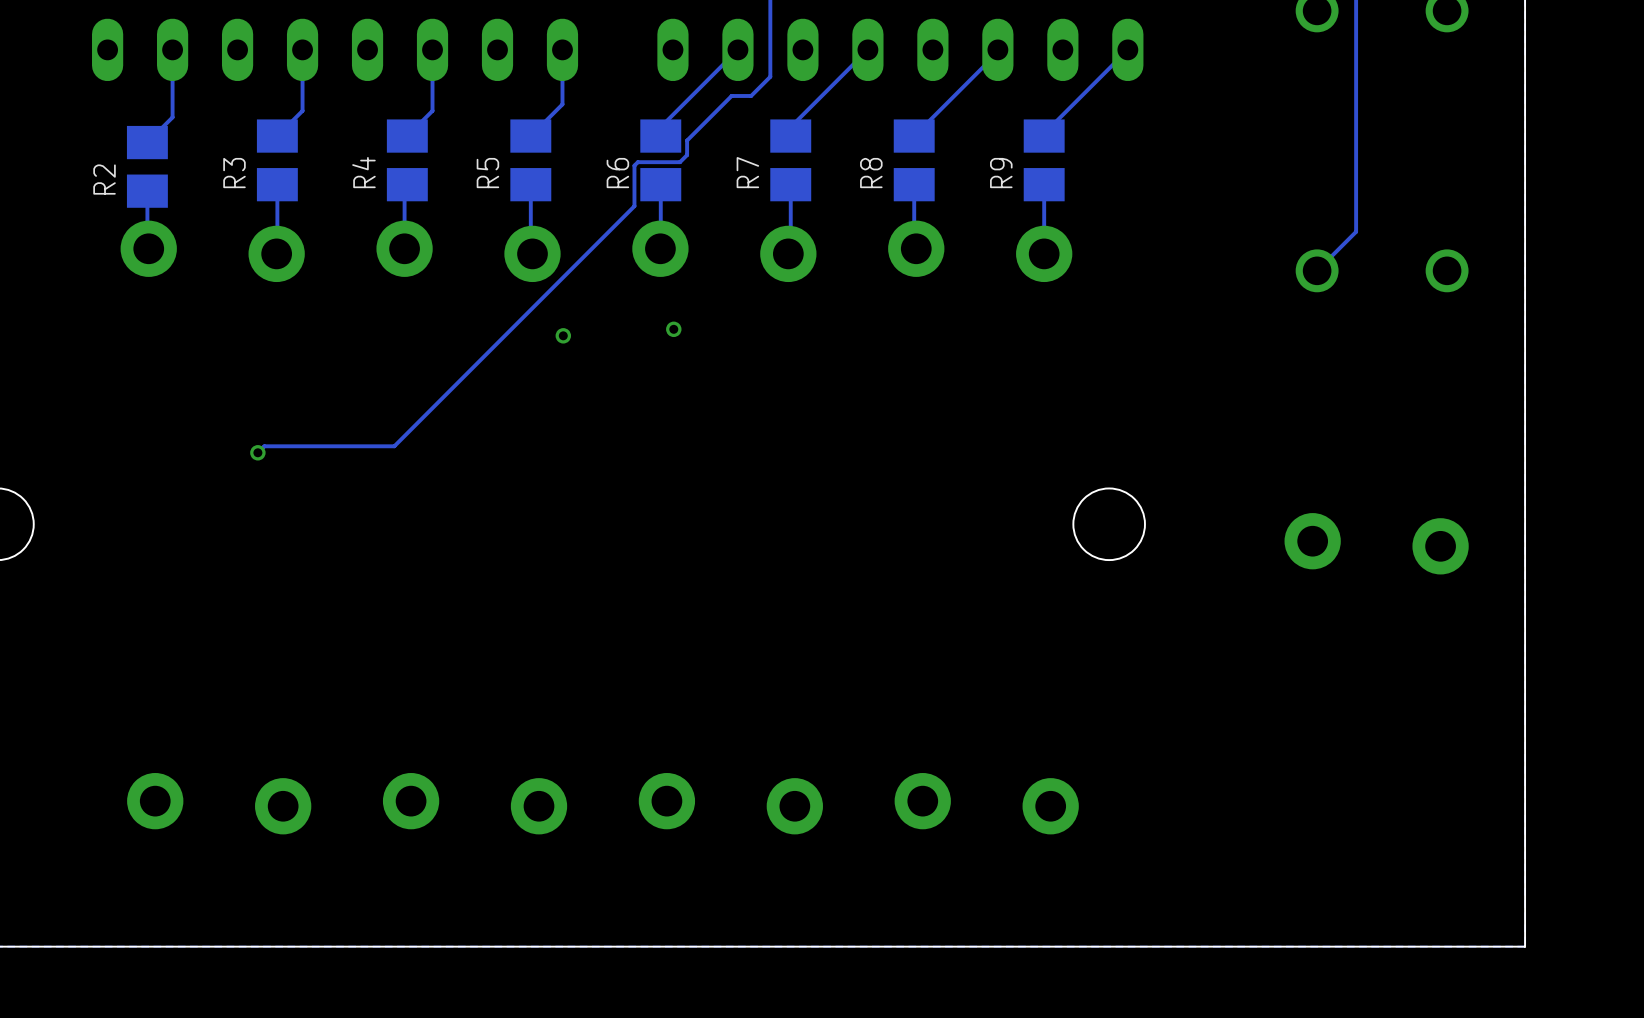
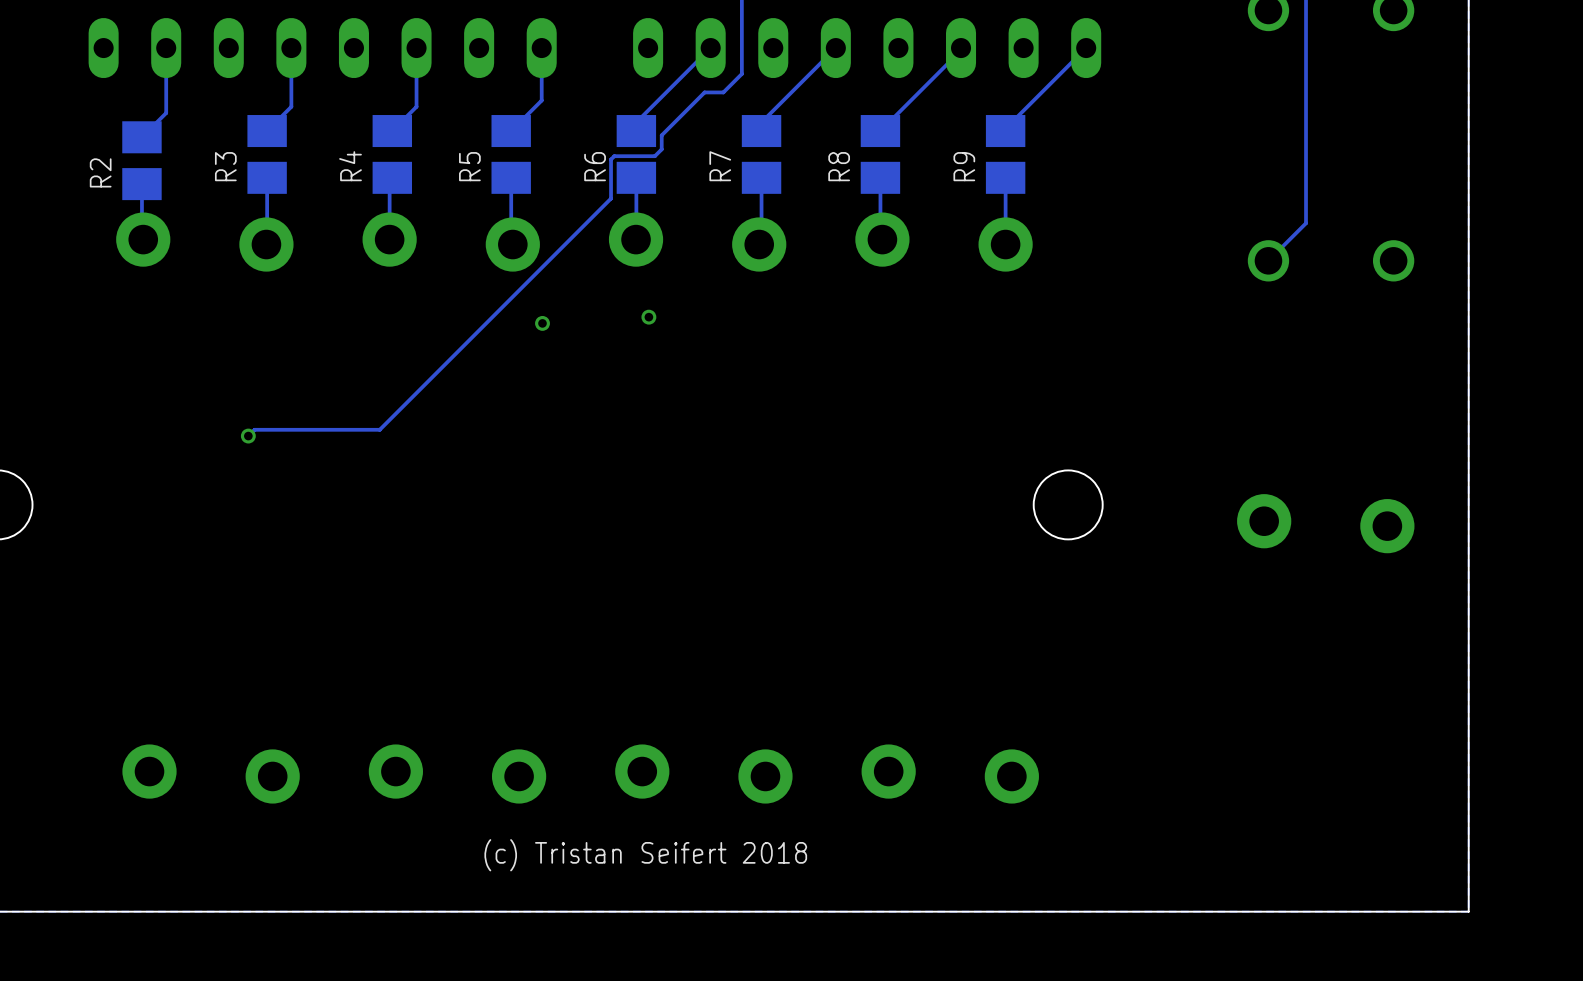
text: none -> (c) Tristan Seifert 2018 (645, 855)

